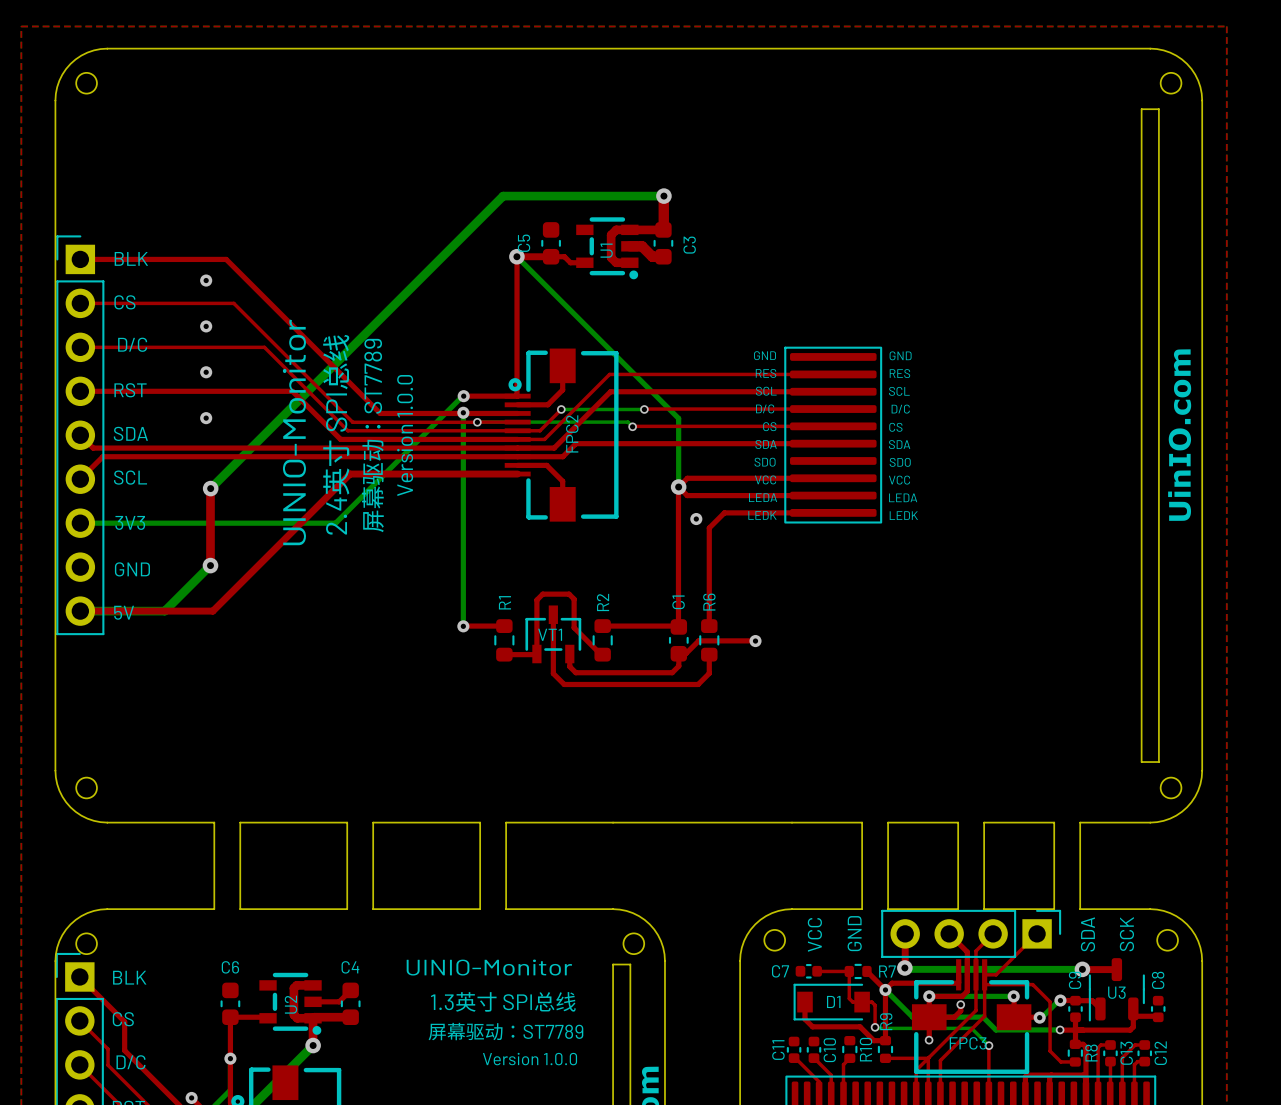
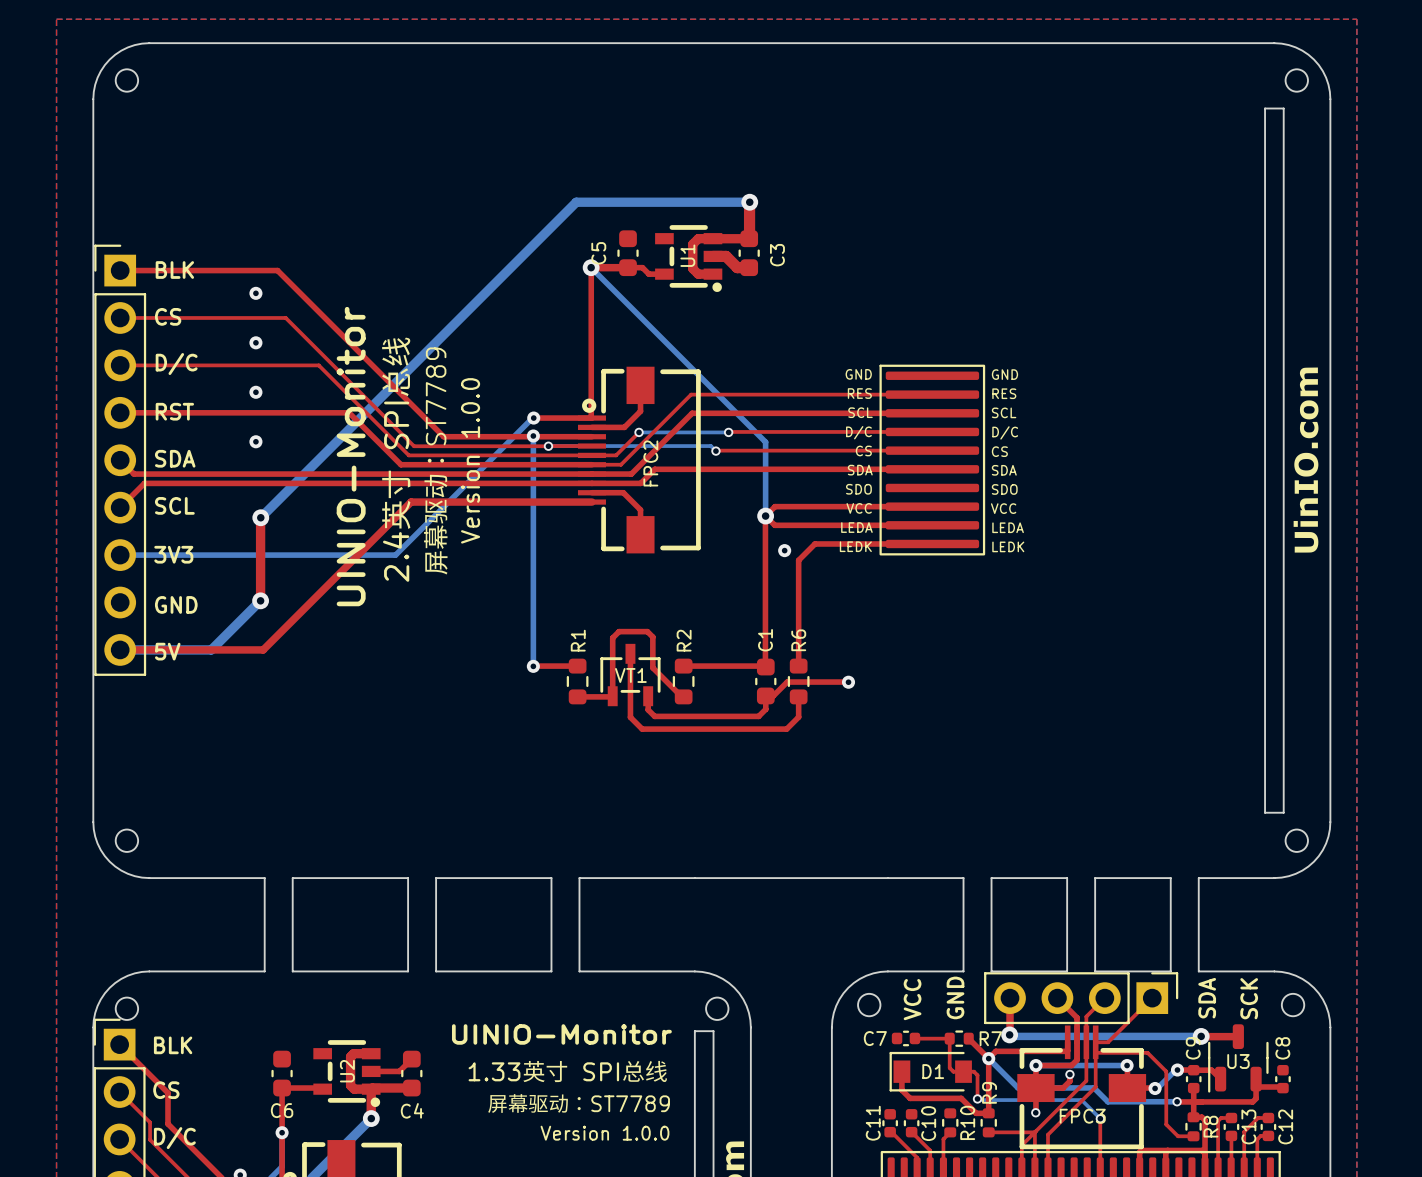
C6 name position: C6 (230, 967) -> C6 (282, 1110)
C4 name position: C4 (350, 967) -> C4 (412, 1110)
text: 1.3英寸 SPI总线 (503, 1001) -> 1.33英寸 SPI总线 (568, 1071)

